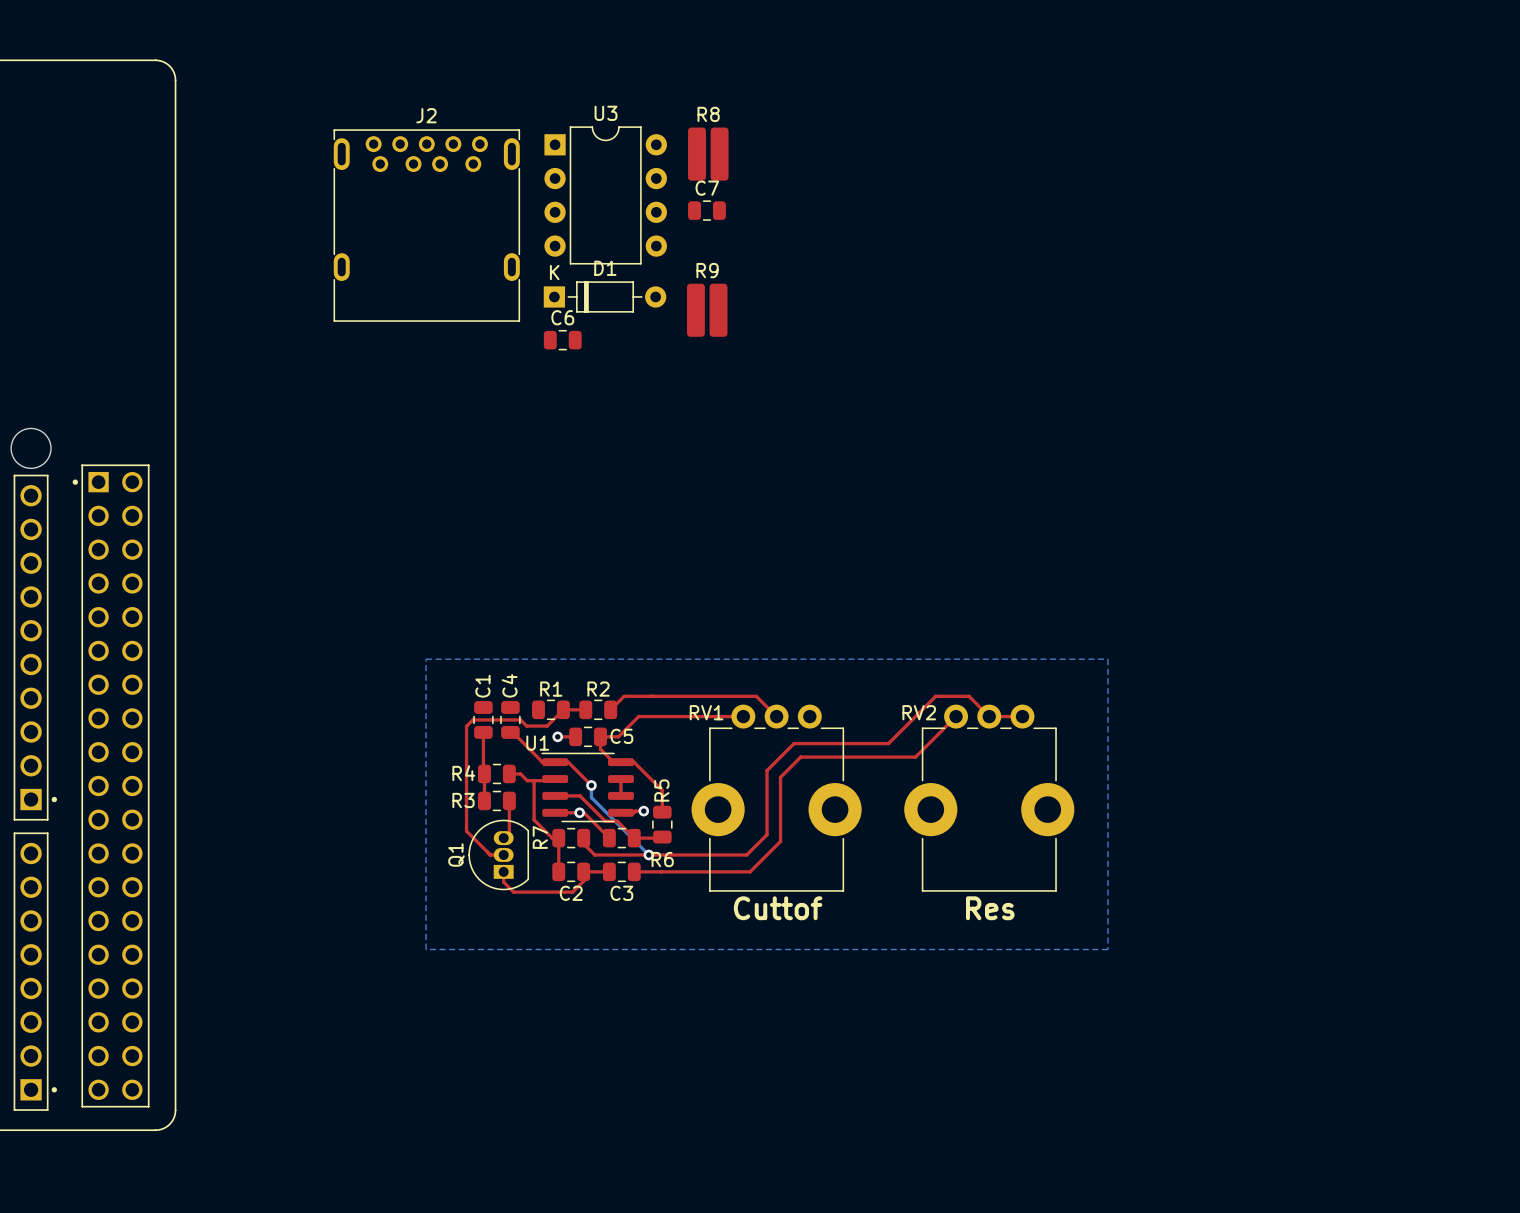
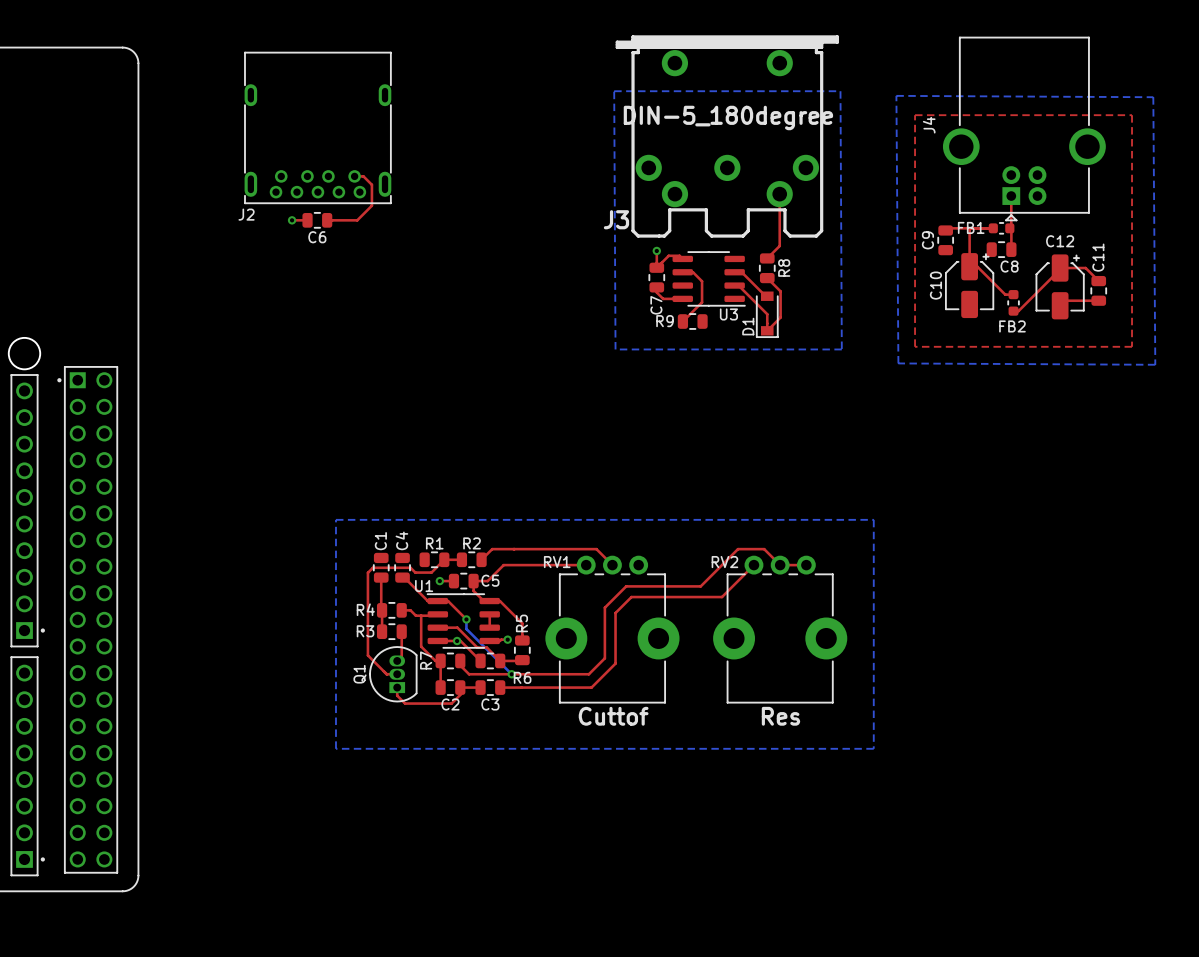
U3 name position: U3 (606, 113) -> U3 (728, 314)
R8 name position: R8 (708, 114) -> R8 (784, 268)
J2 name position: J2 (426, 115) -> J2 (246, 214)
bottom zone outline: none -> (614, 91) (615, 349) (841, 349) (840, 91) (614, 91)
bottom zone outline: none -> (896, 95) (898, 363) (1155, 364) (1153, 97) (896, 95)
U3 footprint: [544, 126, 667, 265] -> [672, 251, 746, 307]
R8 footprint: [688, 127, 729, 181] -> [759, 253, 776, 284]
top zone outline: none -> (915, 115) (915, 346) (1132, 346) (1132, 115) (915, 115)
J4: none -> (1024, 128)
J3: none -> DIN-5_180degree (727, 136)
C7 name position: C7 (707, 188) -> C7 (656, 305)
C7 rotation: 0° (706, 210) -> 90° clockwise (656, 277)
C7 position: (706, 210) -> (656, 277)
top track: none -> (354, 176) (363, 176) (371, 184) (371, 205) (357, 220) (327, 220)
J2 rotation: 0° (426, 225) -> 180° (317, 127)
top track: none -> (779, 194) (779, 246) (767, 258)
top track: none -> (1011, 196) (1009, 228) (1011, 249)
D1 name position: D1 (605, 268) -> D1 (748, 326)
R9 name position: R9 (707, 270) -> R9 (665, 321)
top track: none -> (292, 220) (307, 220)
via: none -> (292, 220)
D1 footprint: [543, 281, 667, 313] -> [756, 291, 779, 338]
R9 footprint: [686, 283, 728, 337] -> [677, 313, 708, 330]
top track: none -> (969, 228) (969, 266) (977, 266) (1005, 294) (1013, 294)
top track: none -> (993, 228) (947, 228) (945, 230)
FB1: none -> (1001, 228)
C9: none -> (945, 240)
C8: none -> (1001, 249)
C6 name position: C6 (562, 317) -> C6 (317, 237)
top track: none -> (656, 250) (656, 267) (668, 255) (679, 255) (682, 258)
via: none -> (656, 250)
C6 position: (562, 340) -> (317, 220)
top track: none -> (682, 272) (692, 272) (702, 281) (702, 302) (682, 321)
top track: none -> (734, 272) (741, 272) (767, 296)
top track: none -> (767, 278) (780, 291) (780, 317) (767, 330) (767, 314) (738, 285) (734, 285)
top track: none -> (1098, 281) (1085, 268) (1060, 268) (1018, 311) (1013, 311)
C10: none -> (969, 285)
C12: none -> (1060, 286)
top track: none -> (656, 287) (656, 292) (663, 298) (682, 298)
C11: none -> (1098, 290)
top track: none -> (1098, 300) (1065, 300) (1060, 305)
FB2: none -> (1013, 302)

